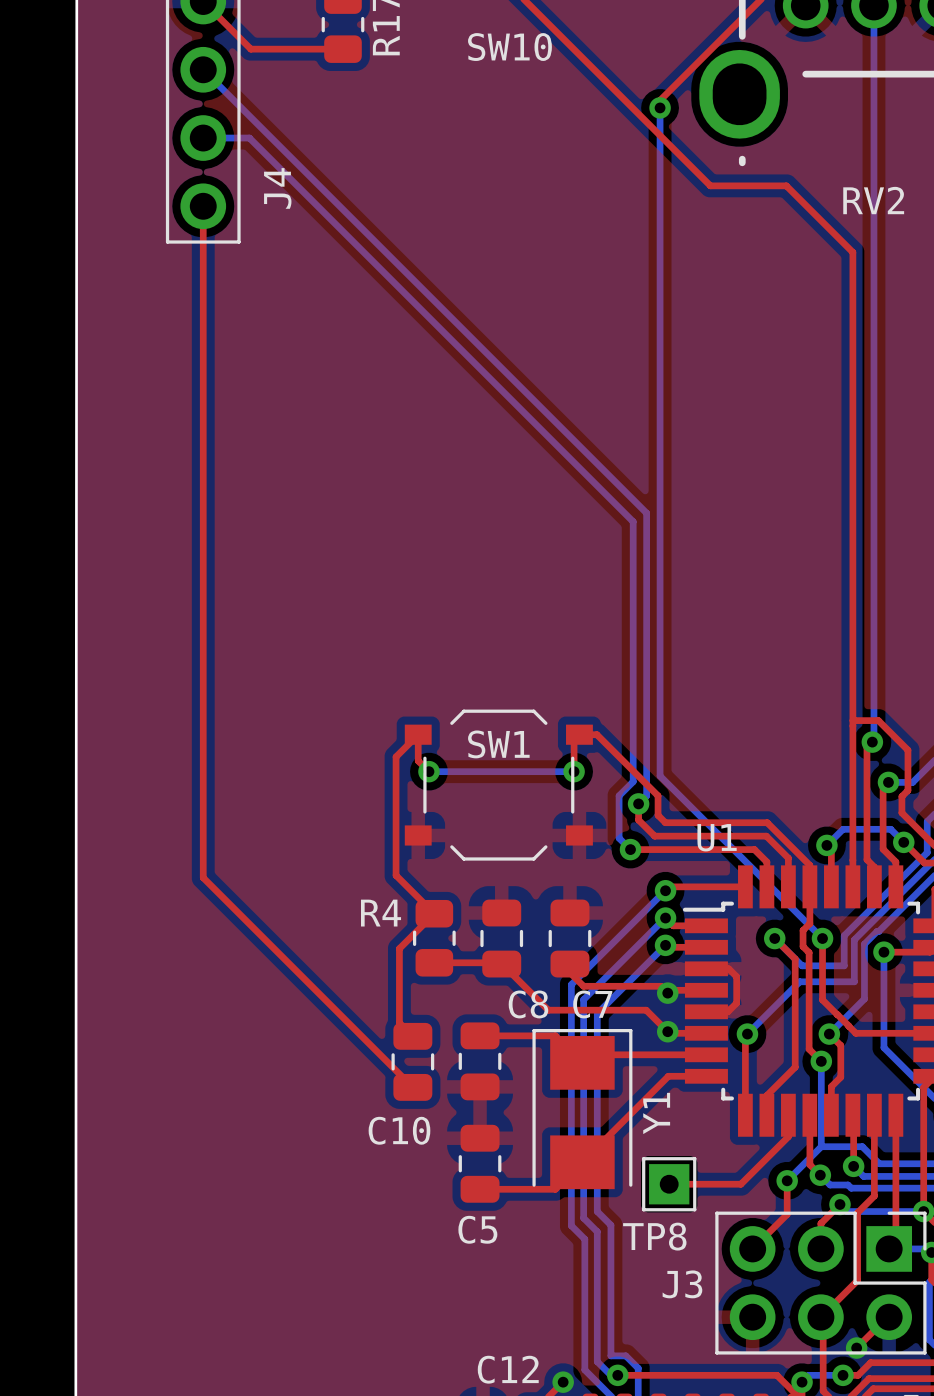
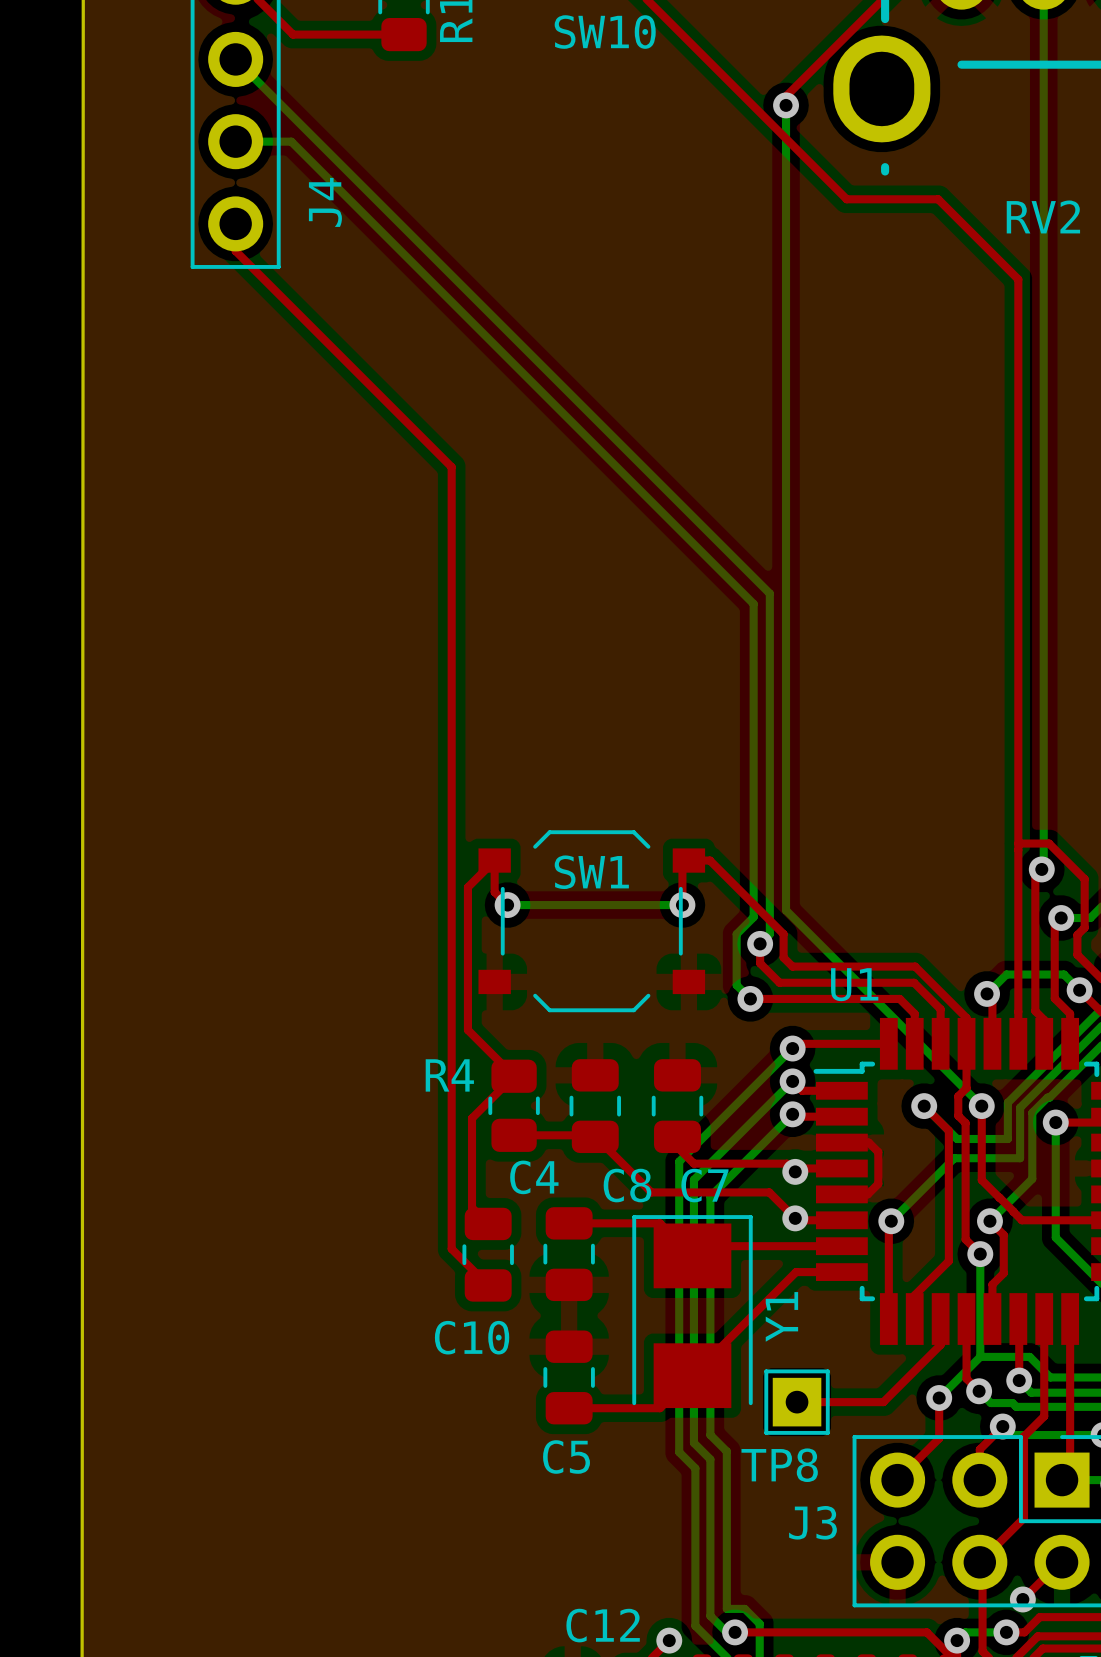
top track: (203, 228) (203, 877) (382, 1057) -> (235, 251) (451, 467) (451, 1248)
C4 name: none -> C4 (534, 1177)

